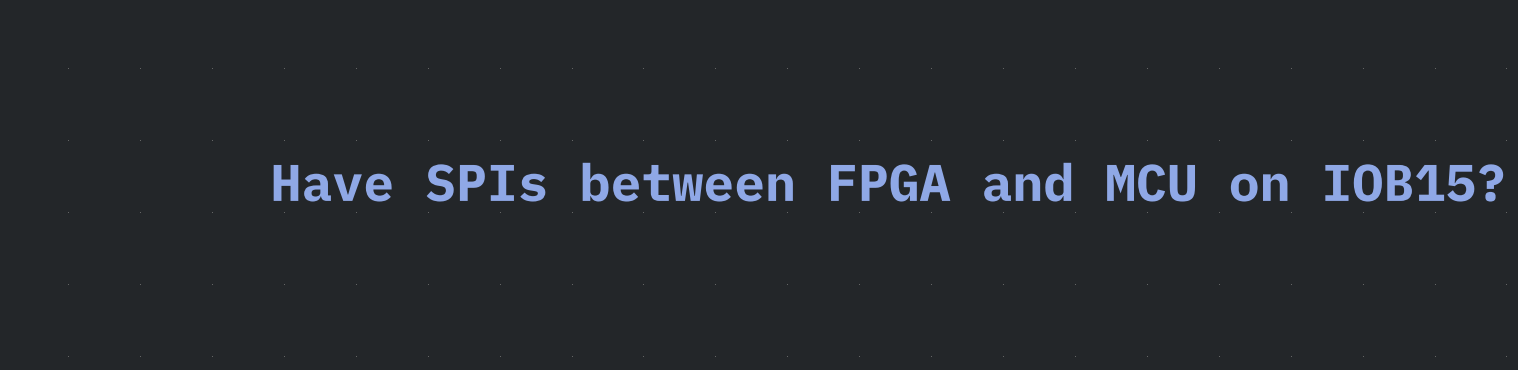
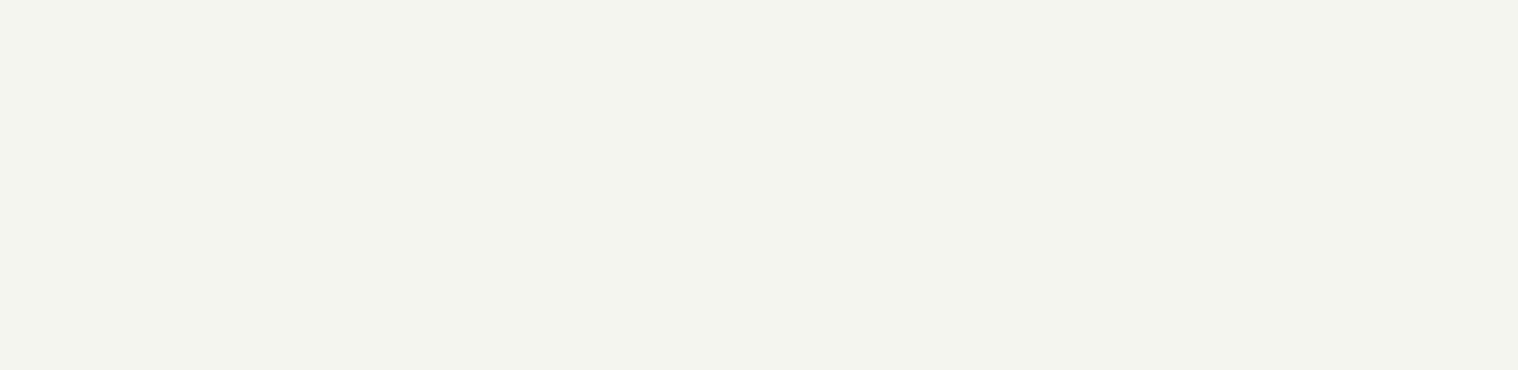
text: Have SPIs between FPGA and MCU on IOB15? (888, 182) -> none

